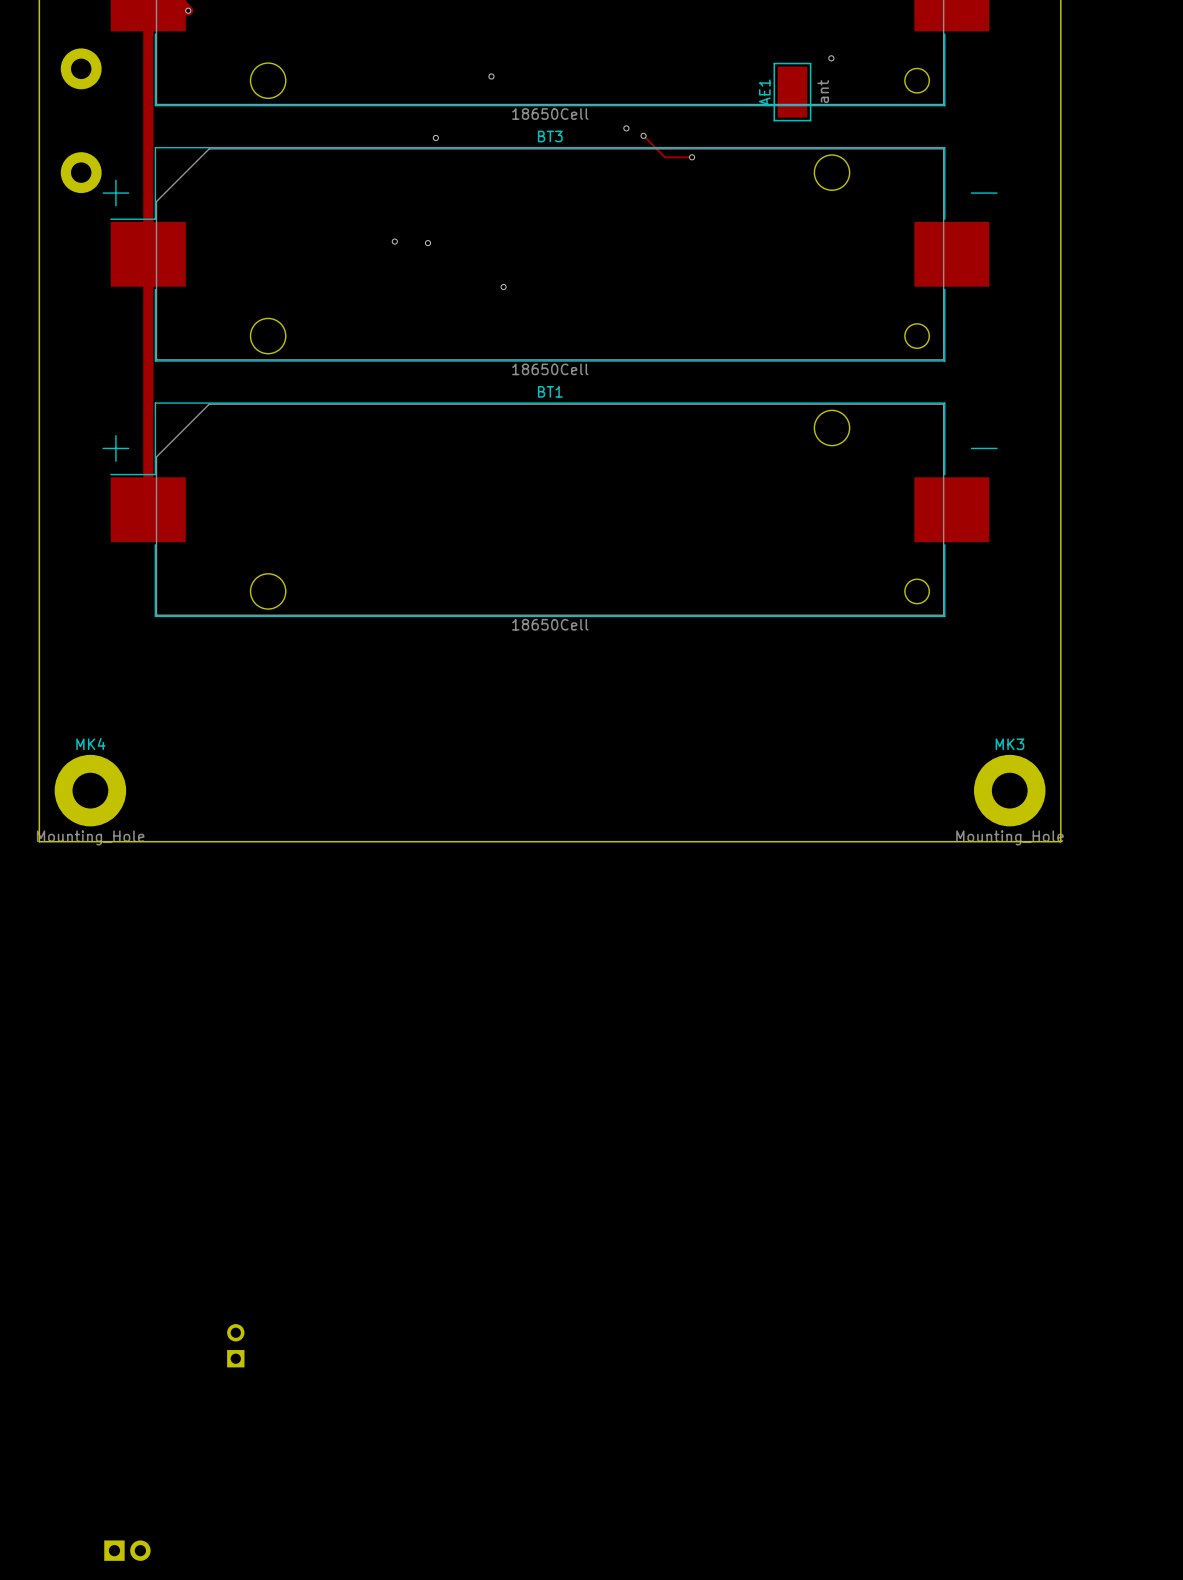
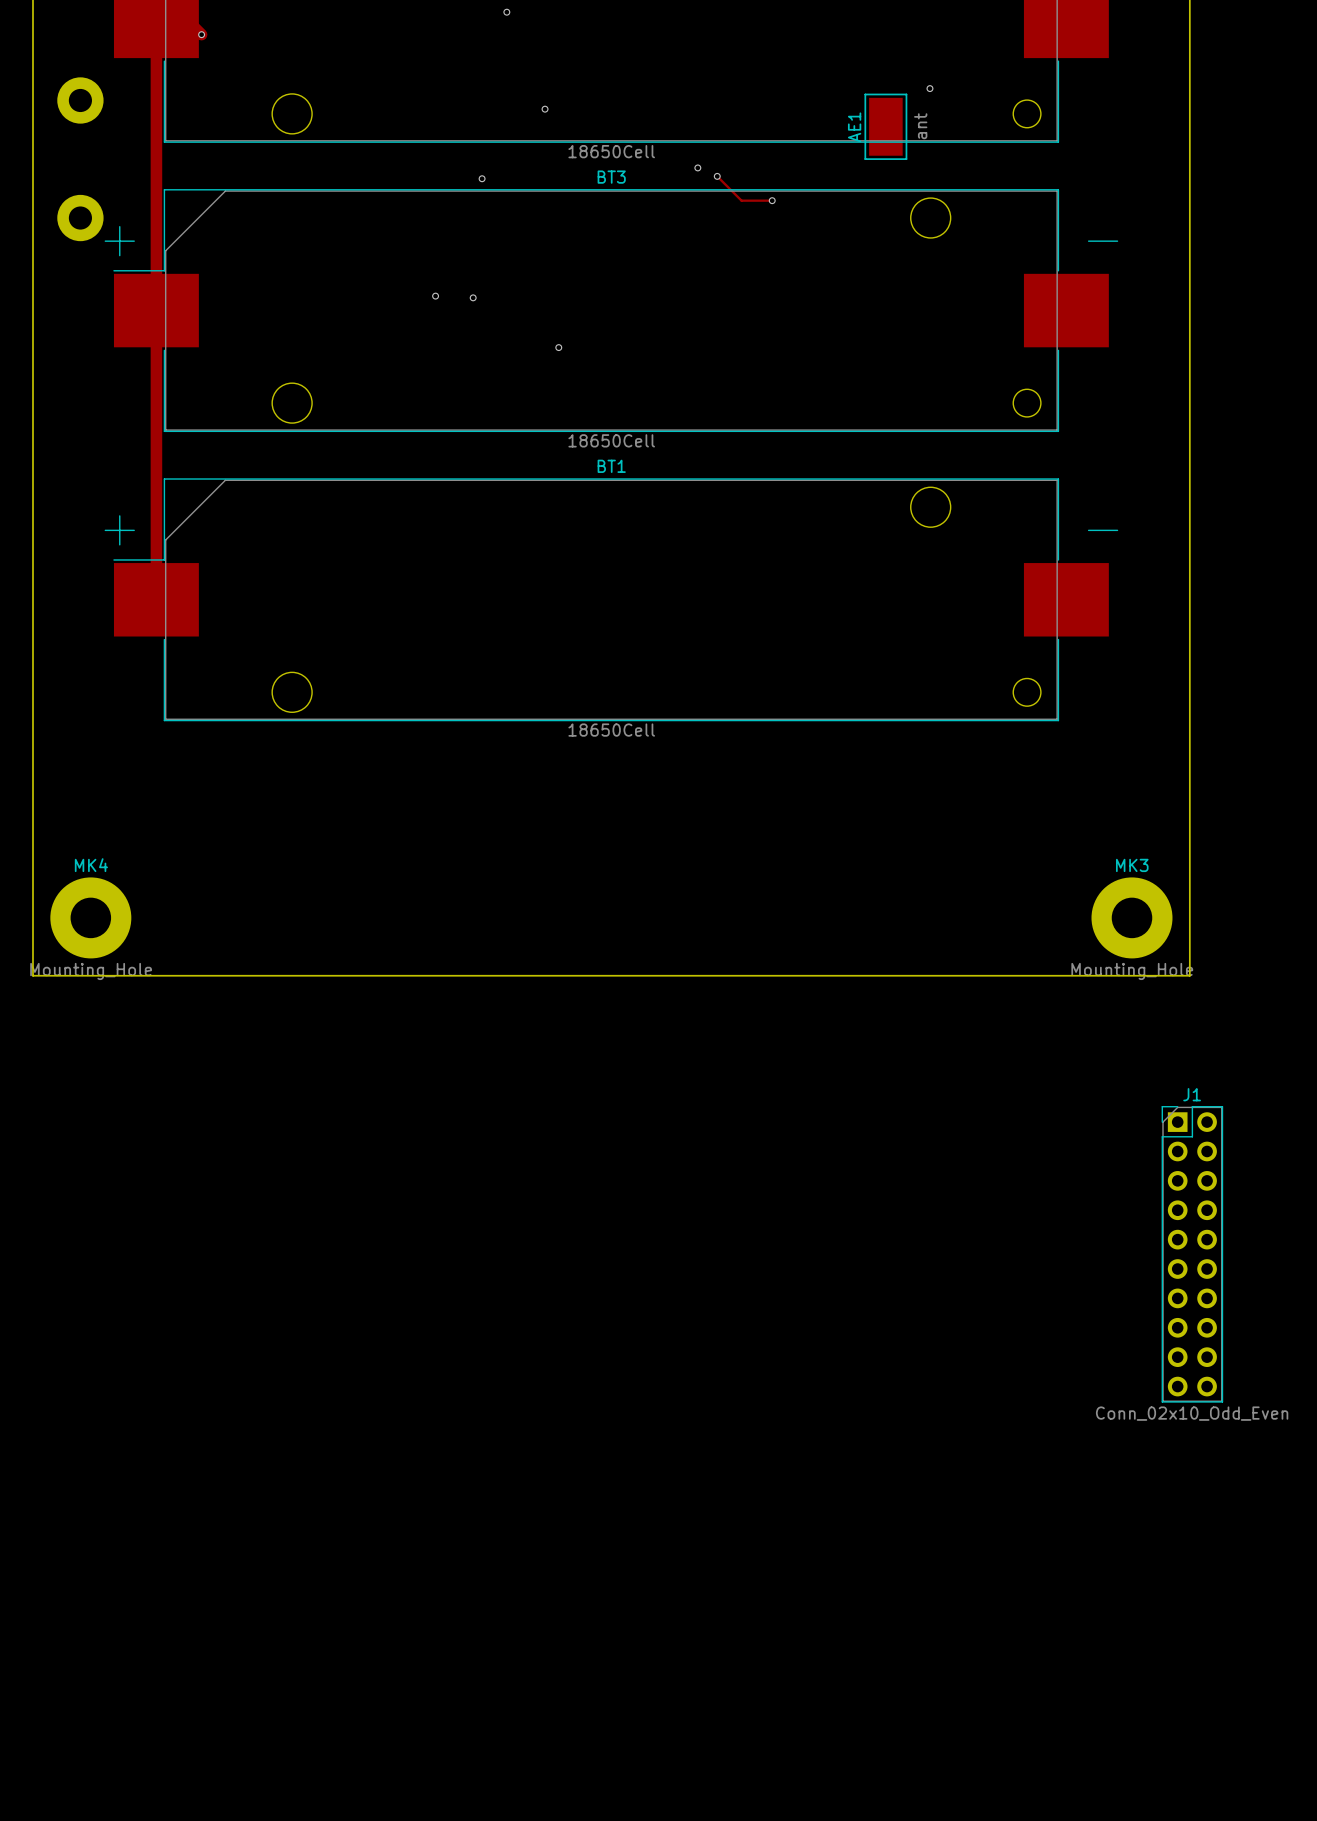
J1: none -> Conn_02x10_Odd_Even (1192, 1254)
part: (235, 1345) -> none
part: (127, 1550) -> none

